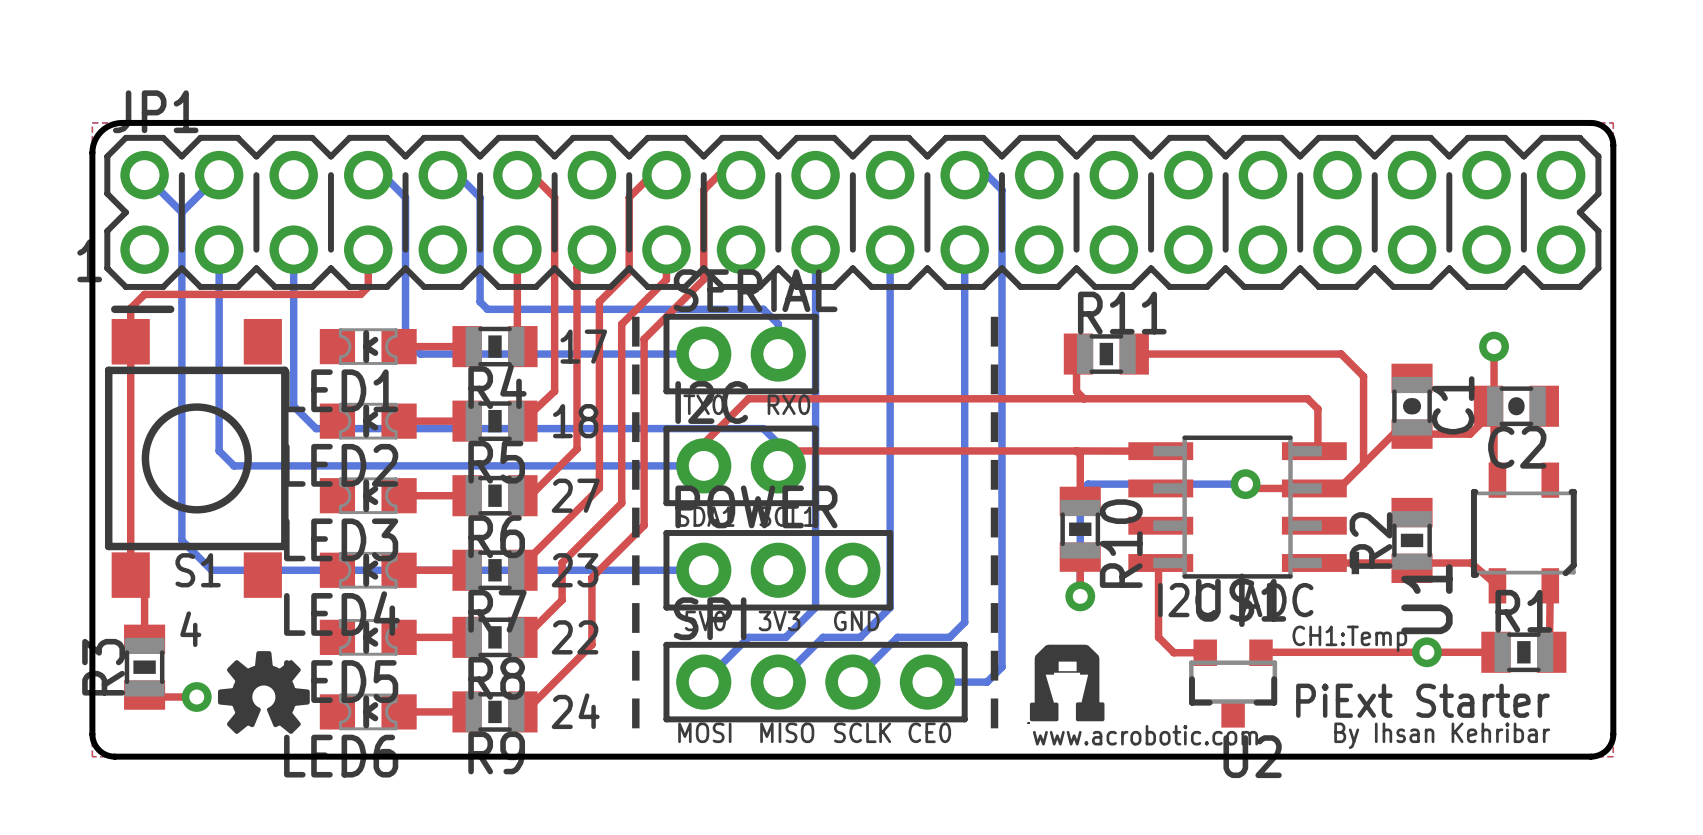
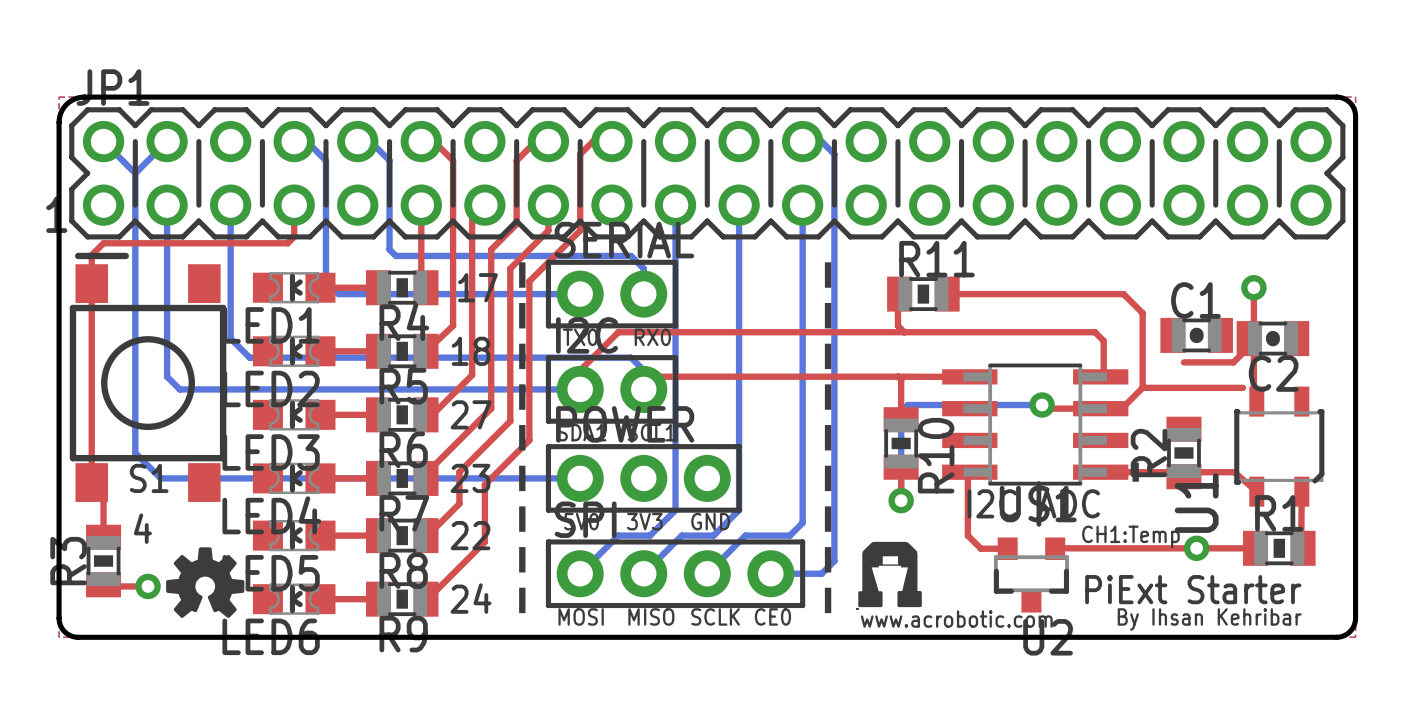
C1 rotation: 0° (1412, 406) -> 90° clockwise (1196, 335)
top track: (1412, 433) (1394, 432) (1363, 464) -> (1243, 387) (1142, 387)

